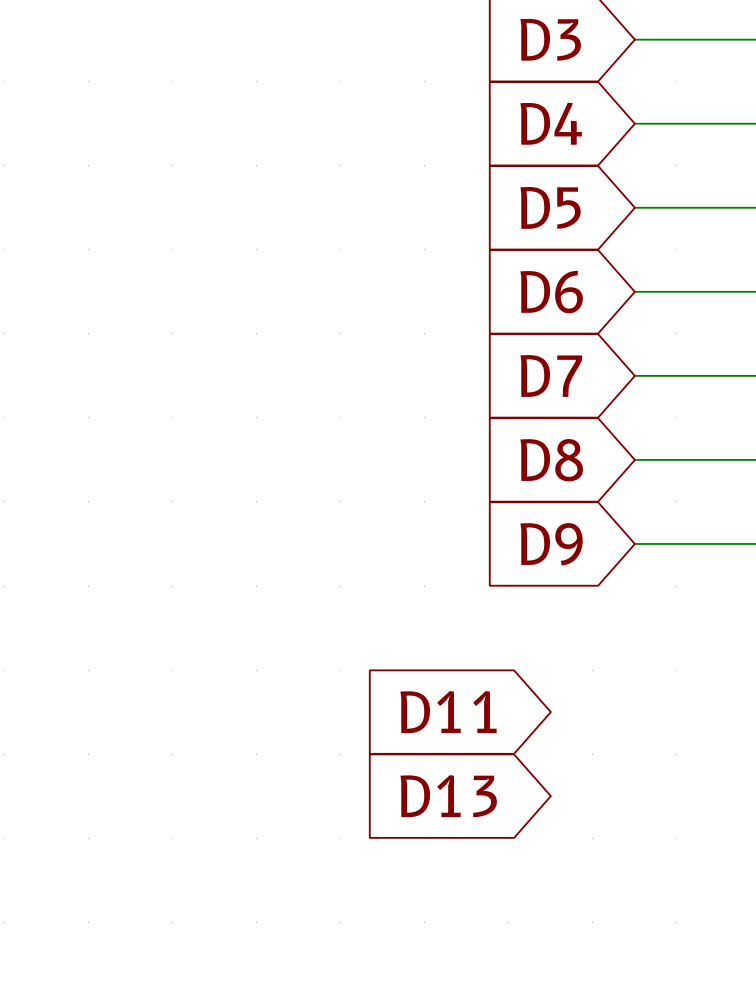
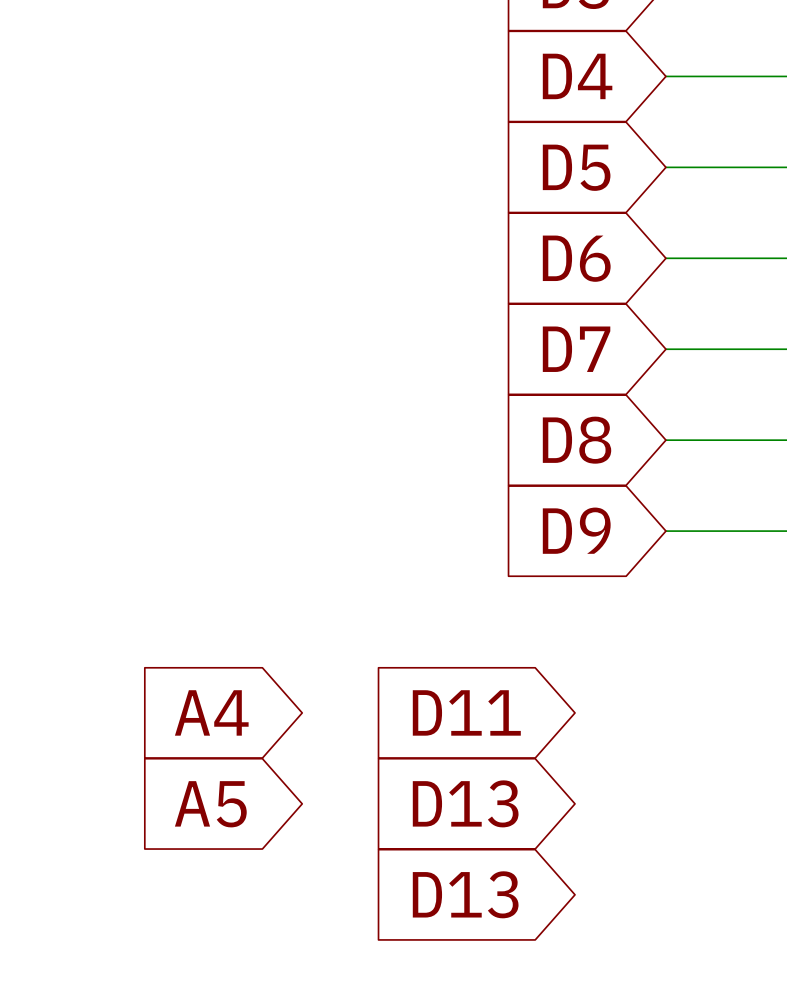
global label: none -> A4 (211, 712)
global label: none -> A5 (210, 804)
global label: none -> D13 (465, 894)

